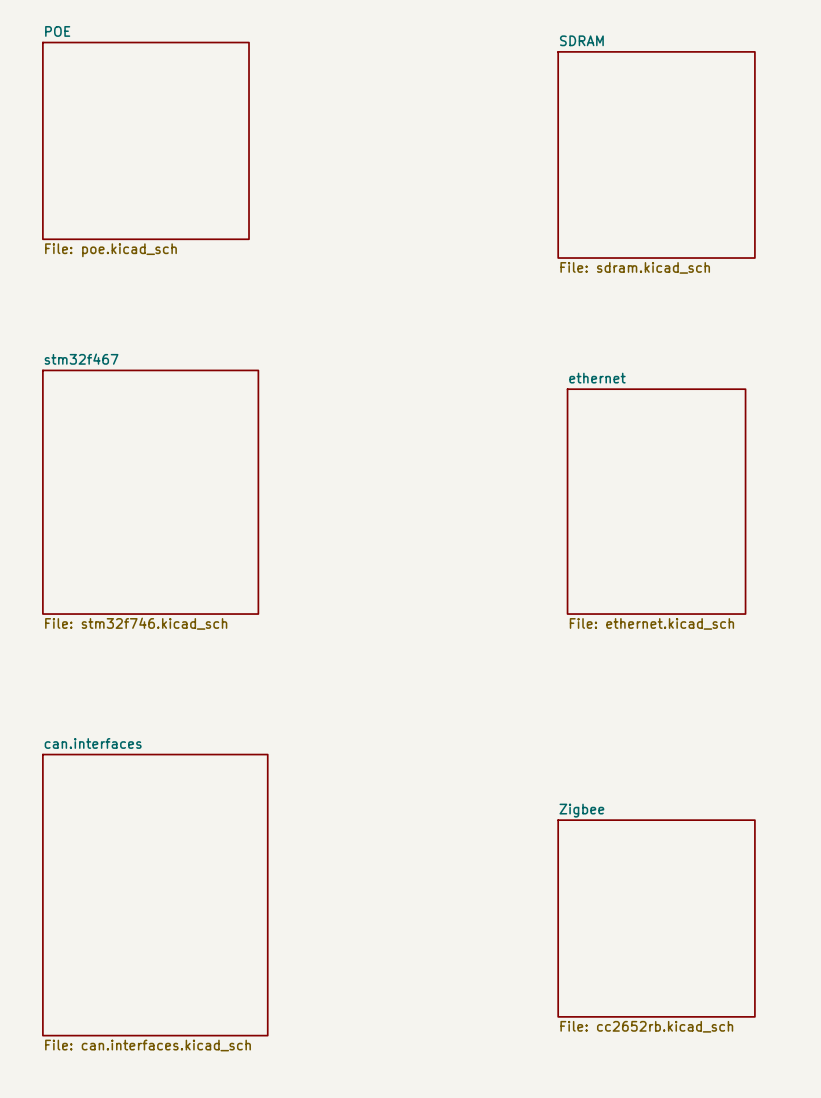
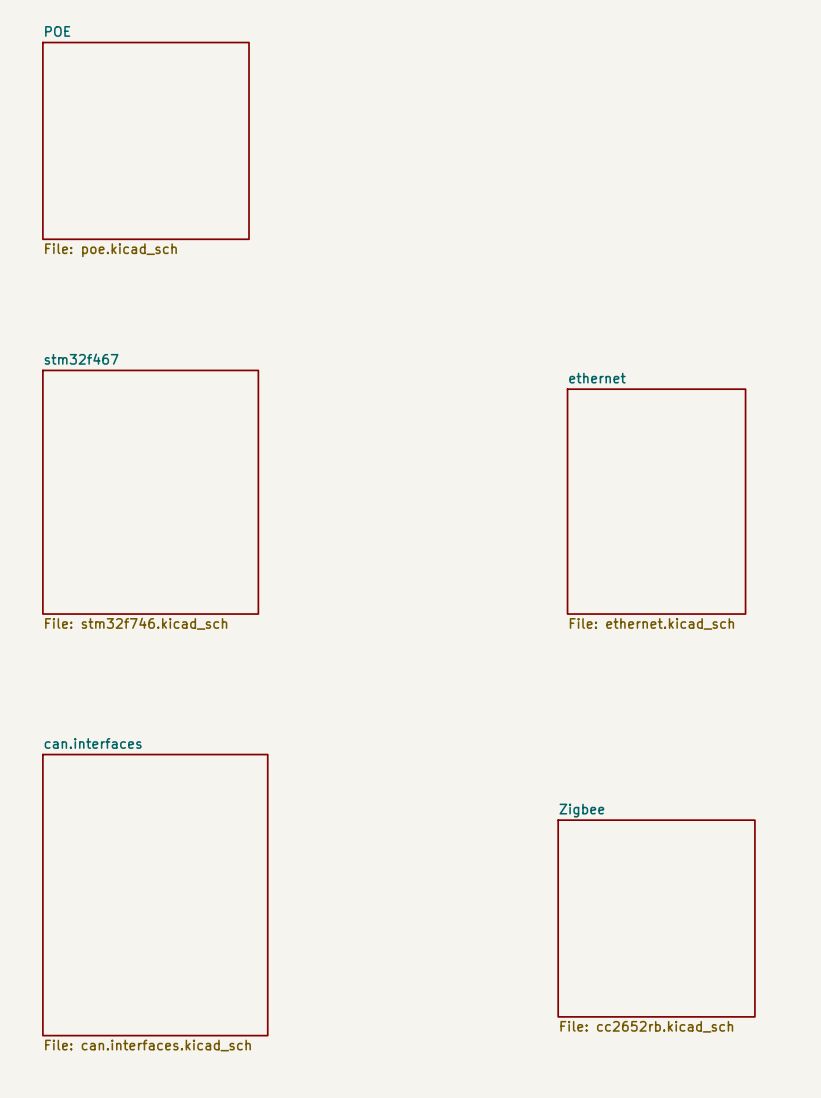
sheet SDRAM: File: sdram.kicad_sch (656, 154) -> none

